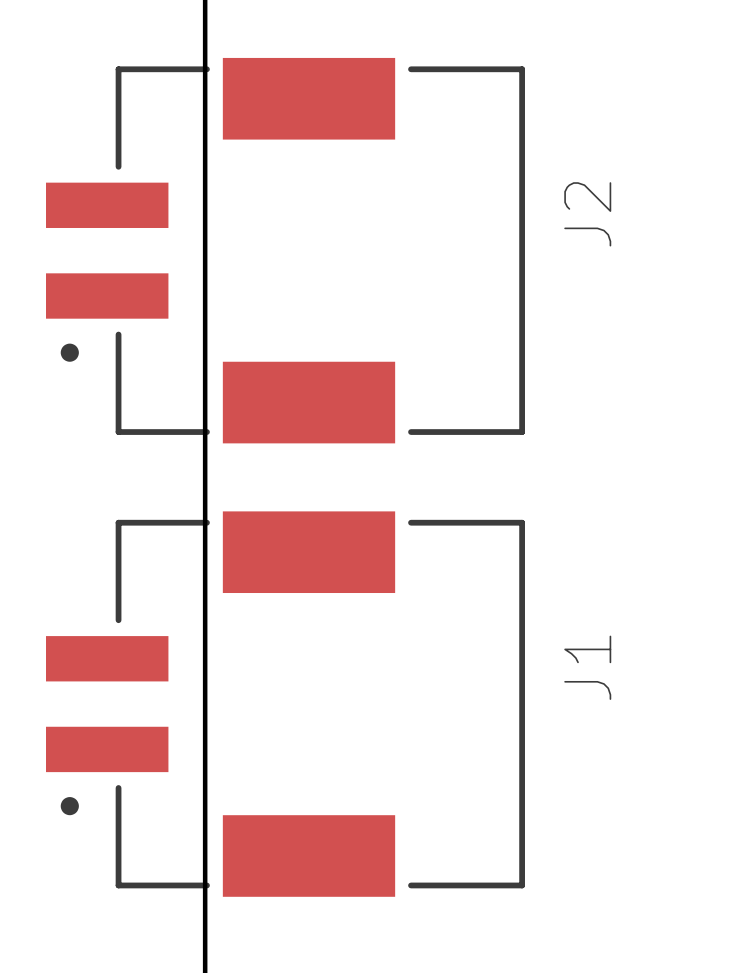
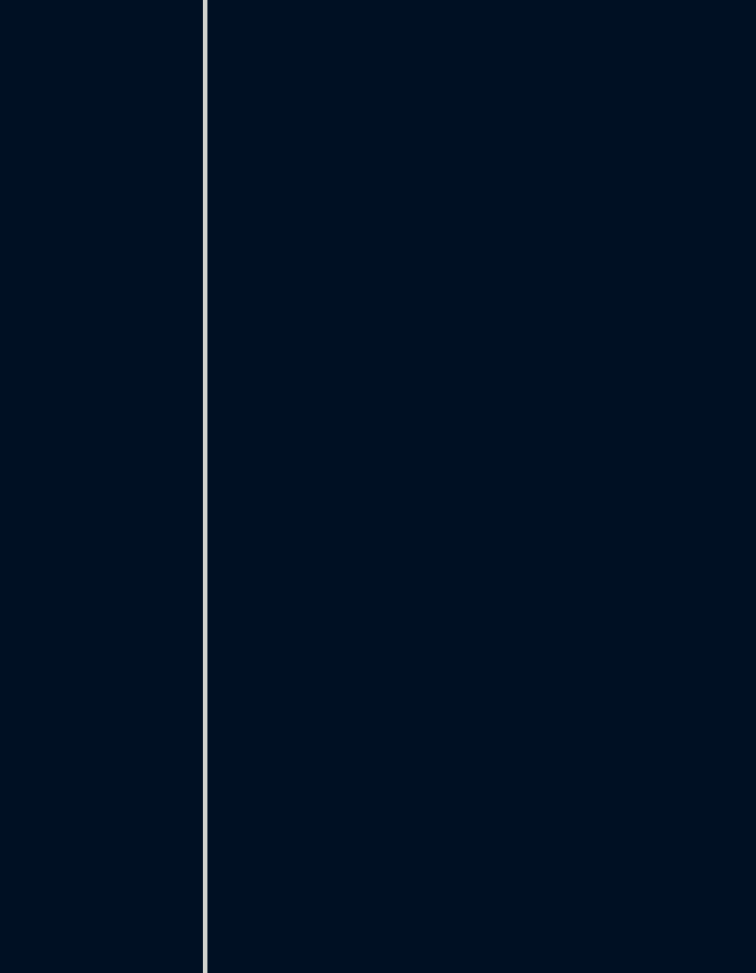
J2: (285, 250) -> none
J1: (285, 704) -> none

